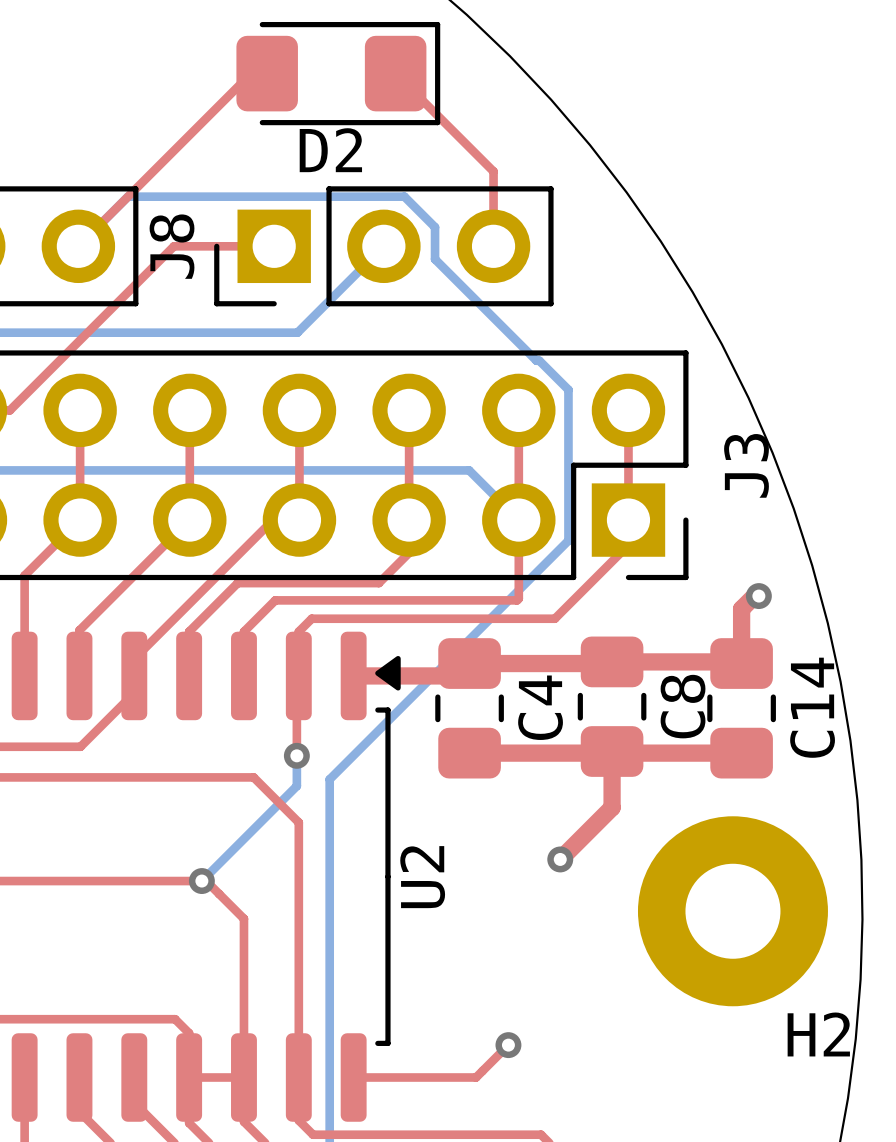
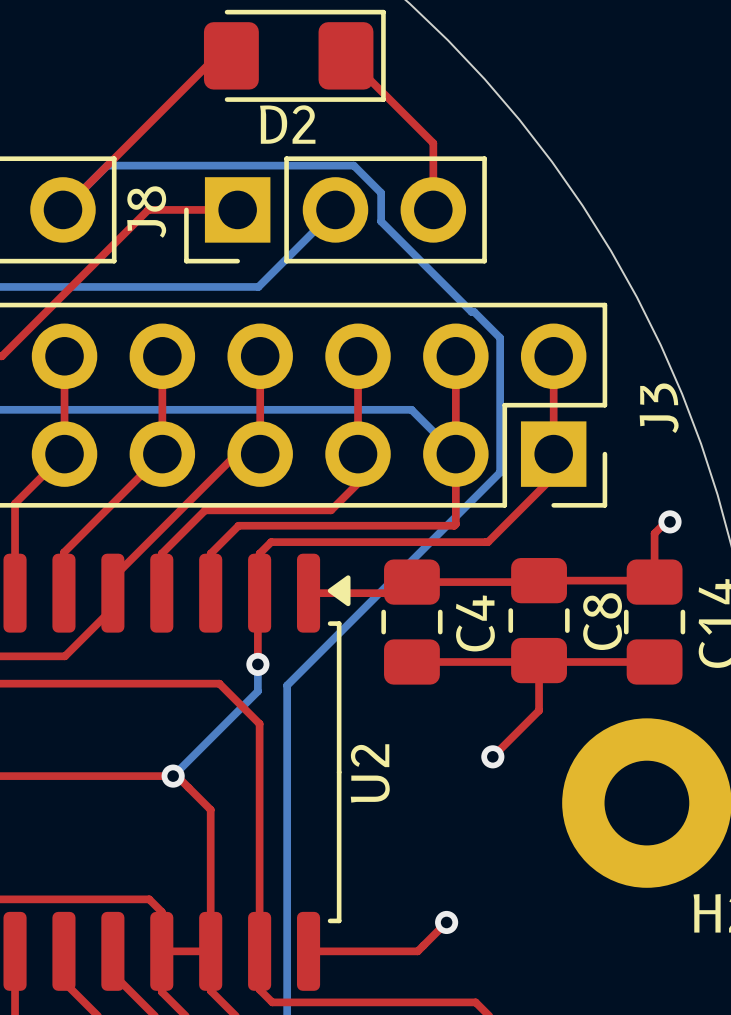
top track width: thick (754, 596) (741, 609) (741, 663) -> thin (666, 521) (654, 533) (654, 582)
top track width: thick (612, 661) (739, 661) -> thin (539, 580) (653, 580)
top track width: thick (469, 663) (610, 663) -> thin (411, 582) (537, 582)
top track width: thick (353, 675) (457, 675) -> thin (308, 593) (400, 593)
top track width: thick (612, 751) (612, 807) (560, 859) -> thin (539, 660) (539, 710) (492, 756)
top track width: thick (469, 753) (610, 753) -> thin (411, 662) (537, 662)
top track width: thick (618, 753) (741, 753) -> thin (544, 662) (654, 662)

